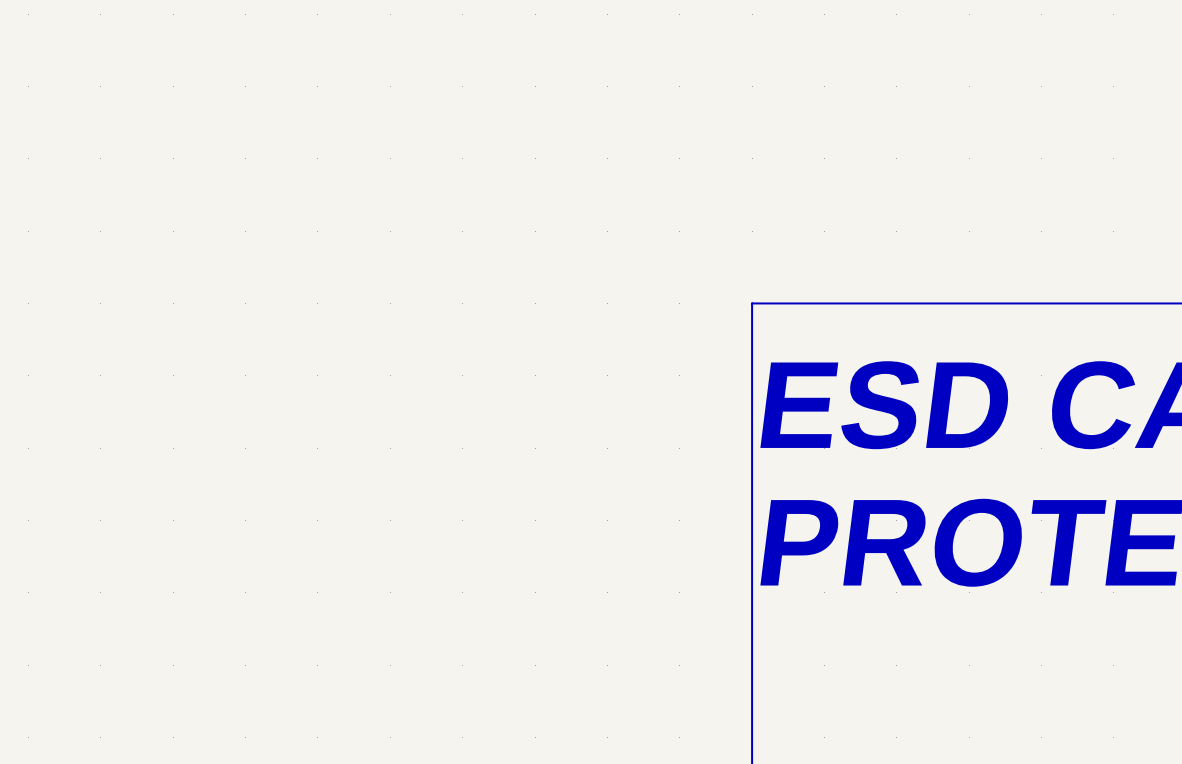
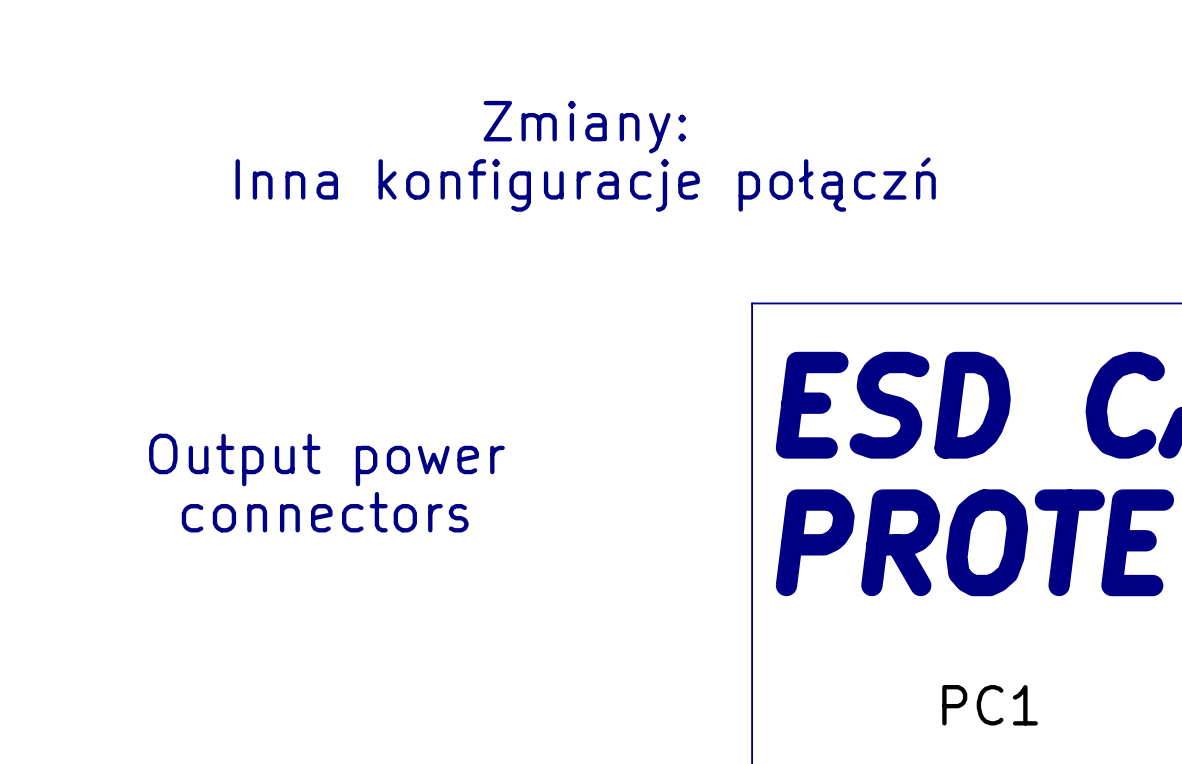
text: none -> Zmiany: (584, 127)
text: none -> Inna konfiguracje połączń (585, 184)
text: none -> Output power (326, 459)
text: none -> connectors (325, 512)
label: none -> PC1 (990, 705)

